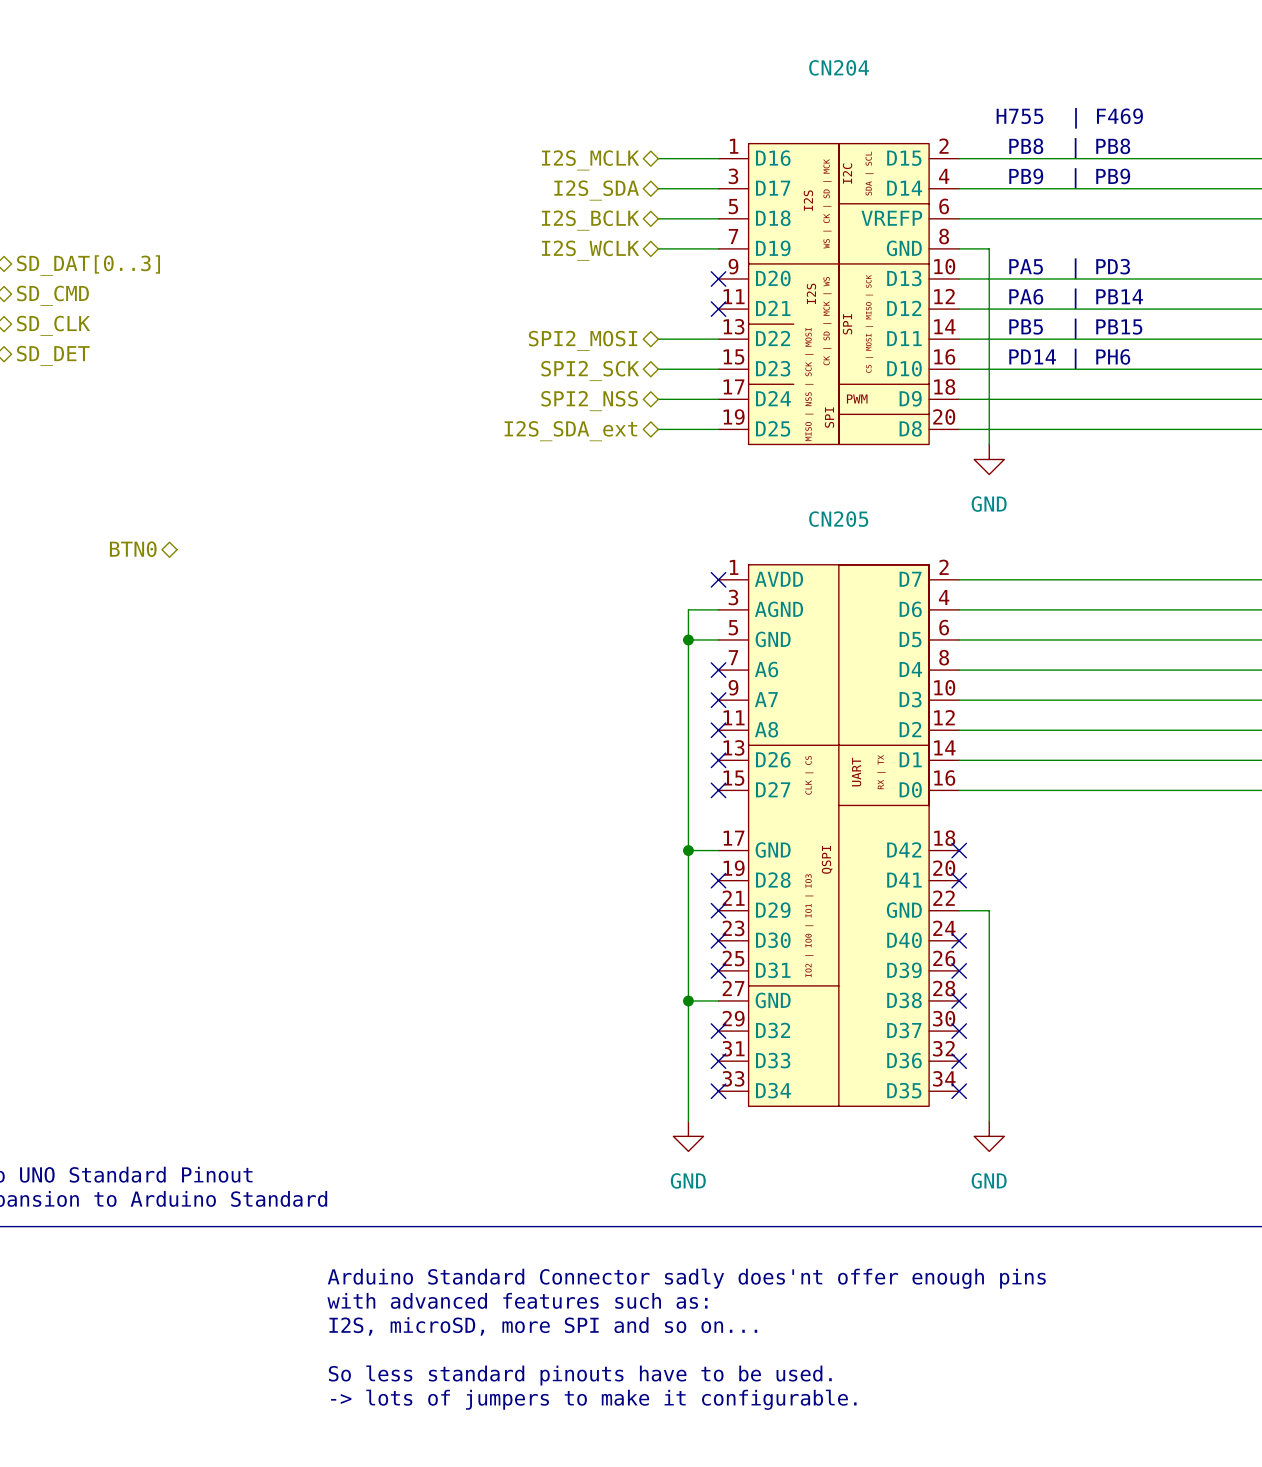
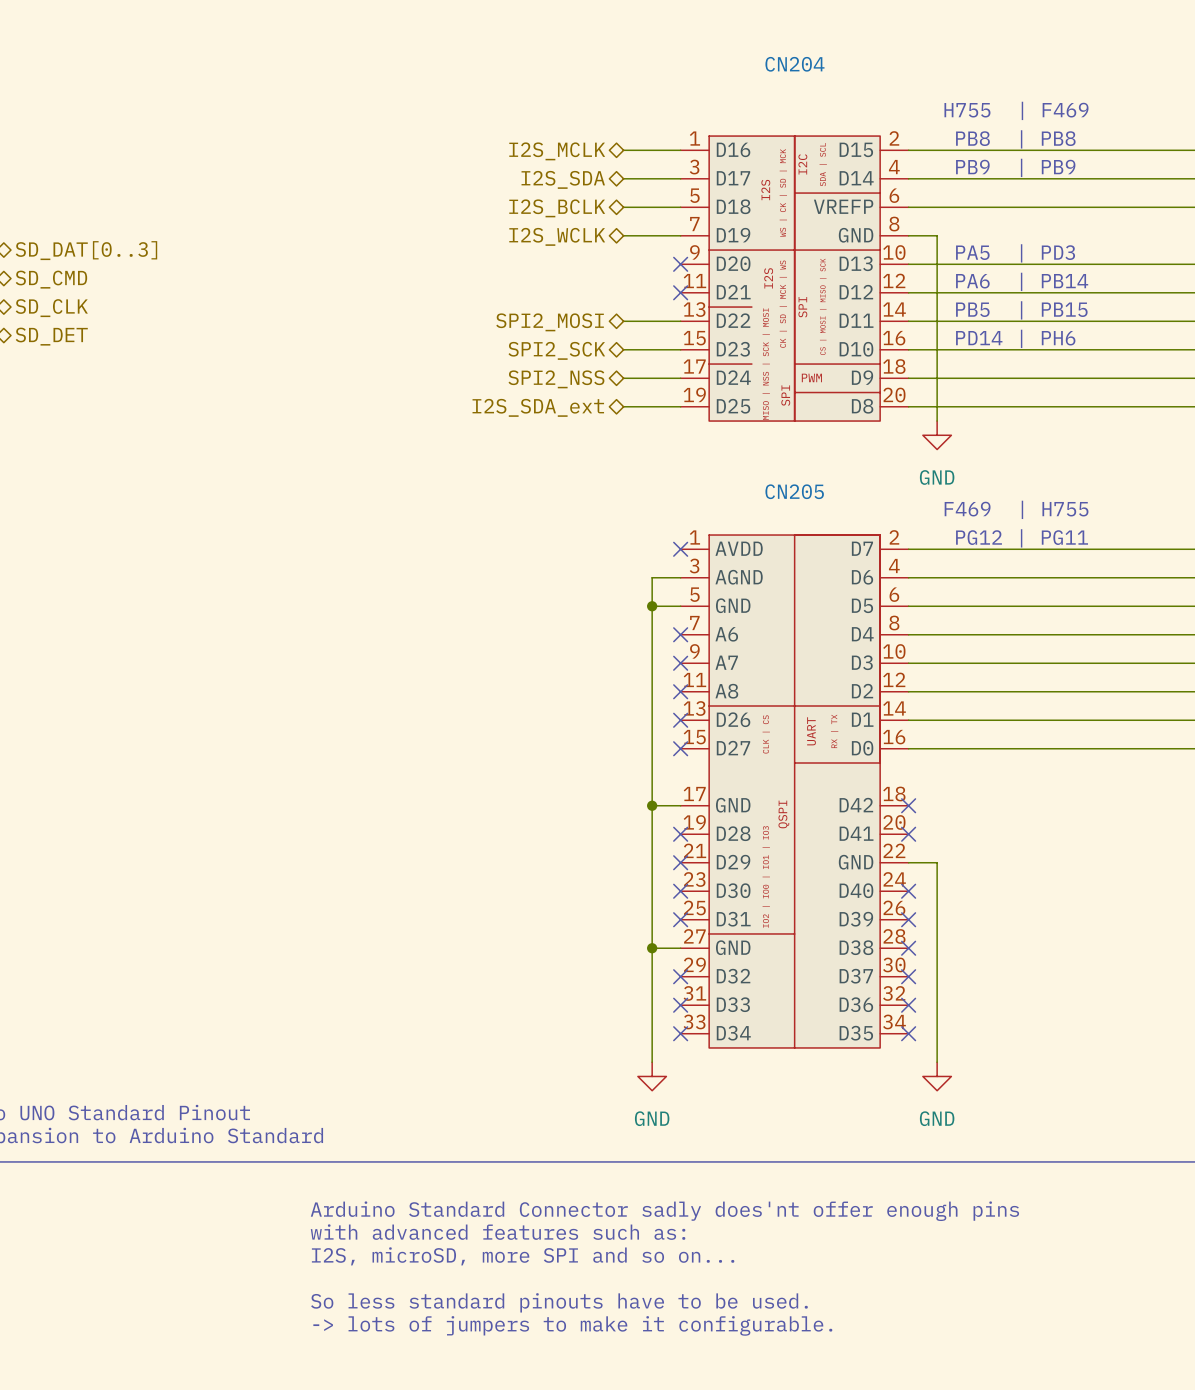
text: none -> F469 | H755 (1016, 509)
hierarchical label: BTN0 (133, 549) -> none
text: none -> PG12 | PG11 (1022, 538)

